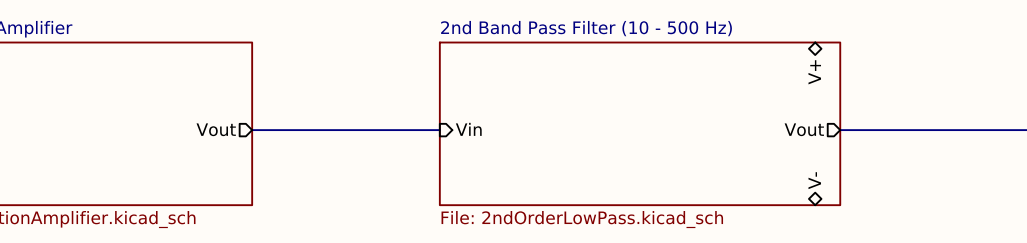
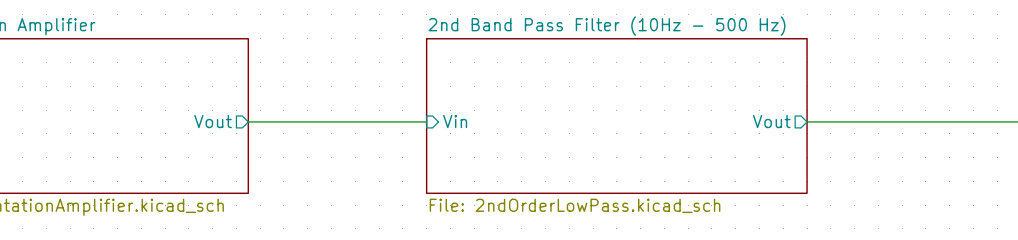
sheet 2nd Band Pass Filter (10 - 500 Hz) name: 2nd Band Pass Filter (10 - 500 Hz) (586, 28) -> 2nd Band Pass Filter (10Hz - 500 Hz) (607, 26)
sheet pin: V+ (814, 72) -> none
sheet pin: V- (814, 180) -> none

